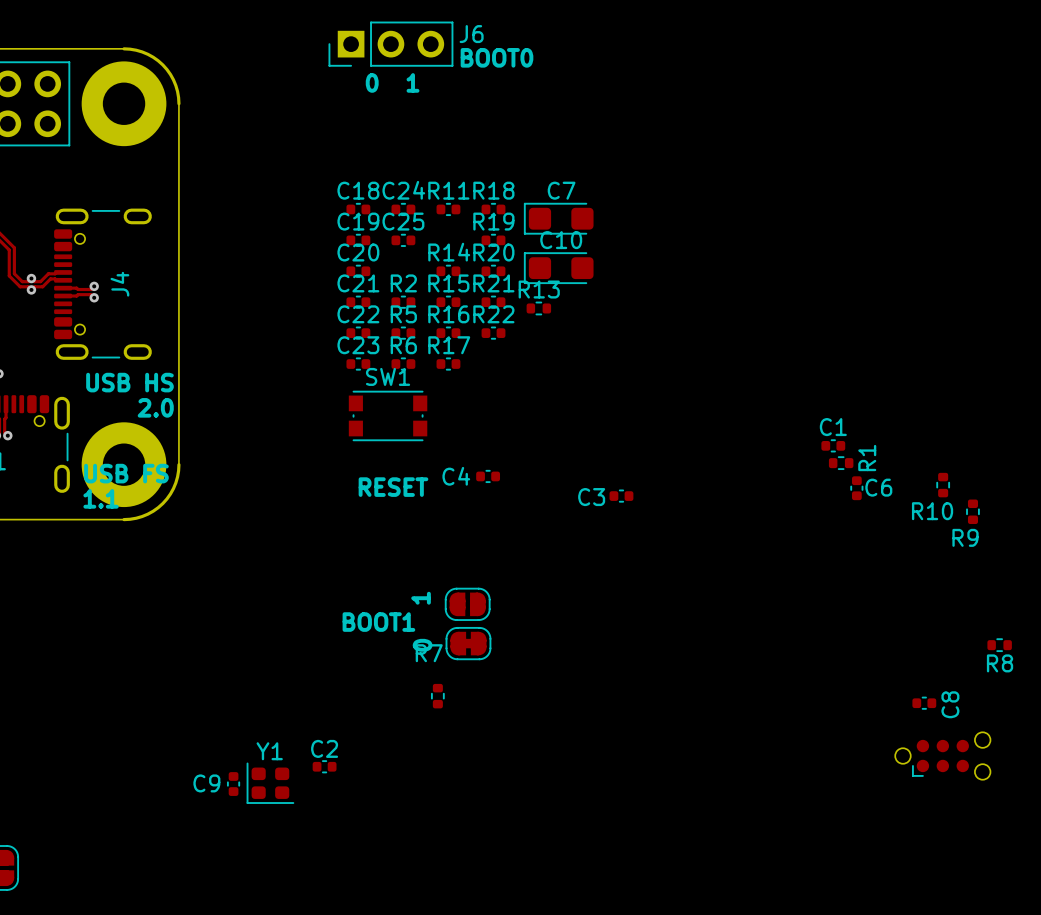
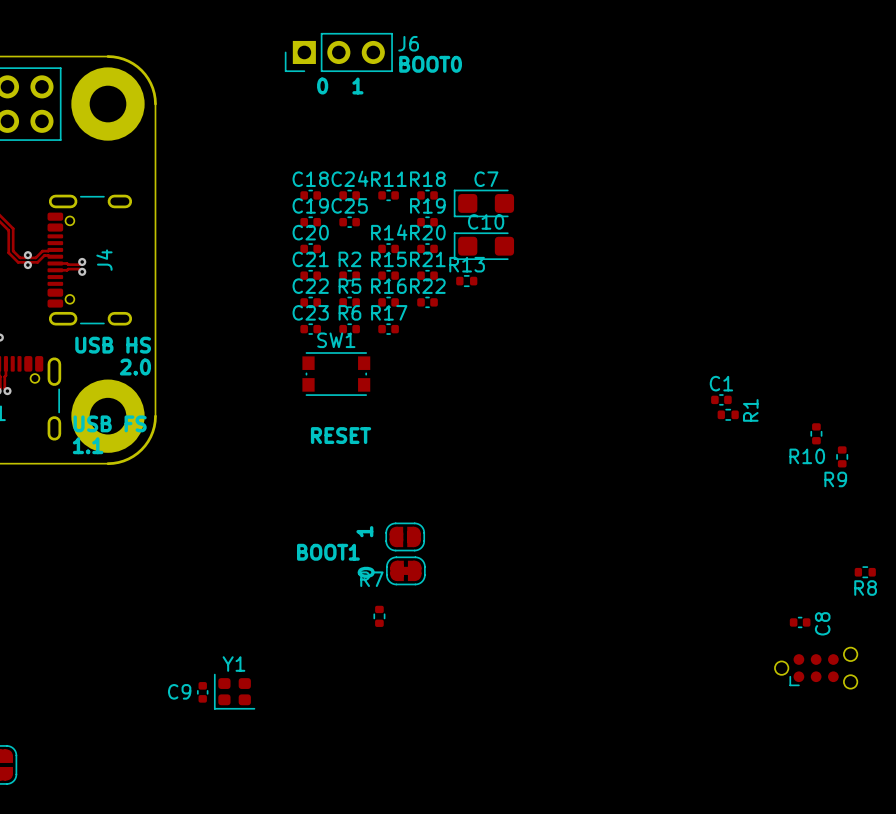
C4: (488, 476) -> none
C6: (856, 488) -> none
C3: (621, 496) -> none
C2: (324, 766) -> none

